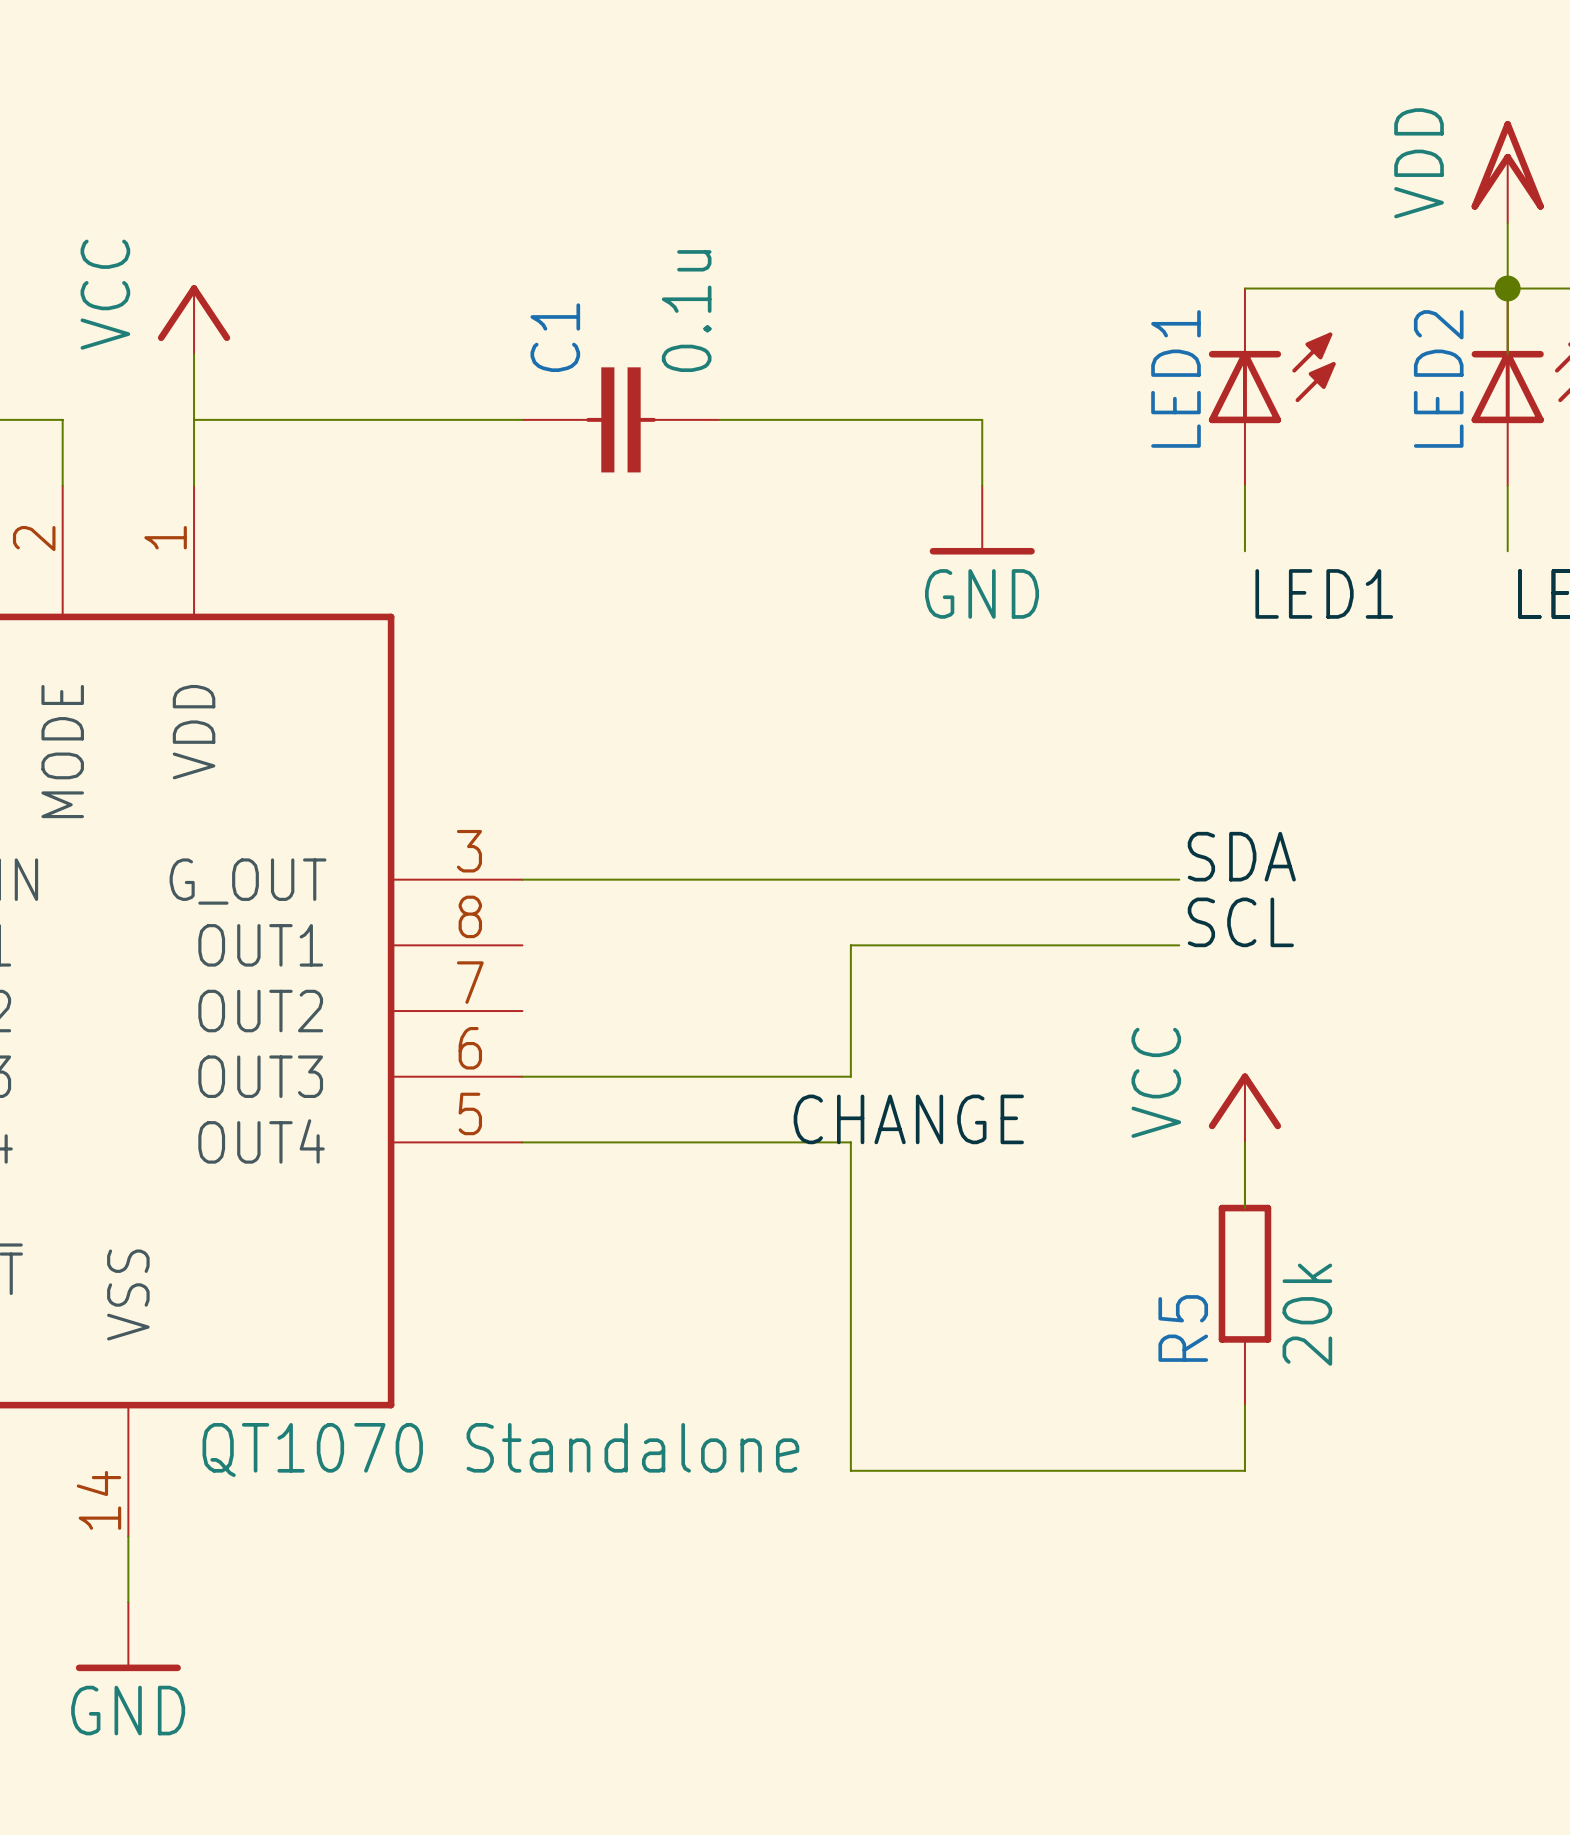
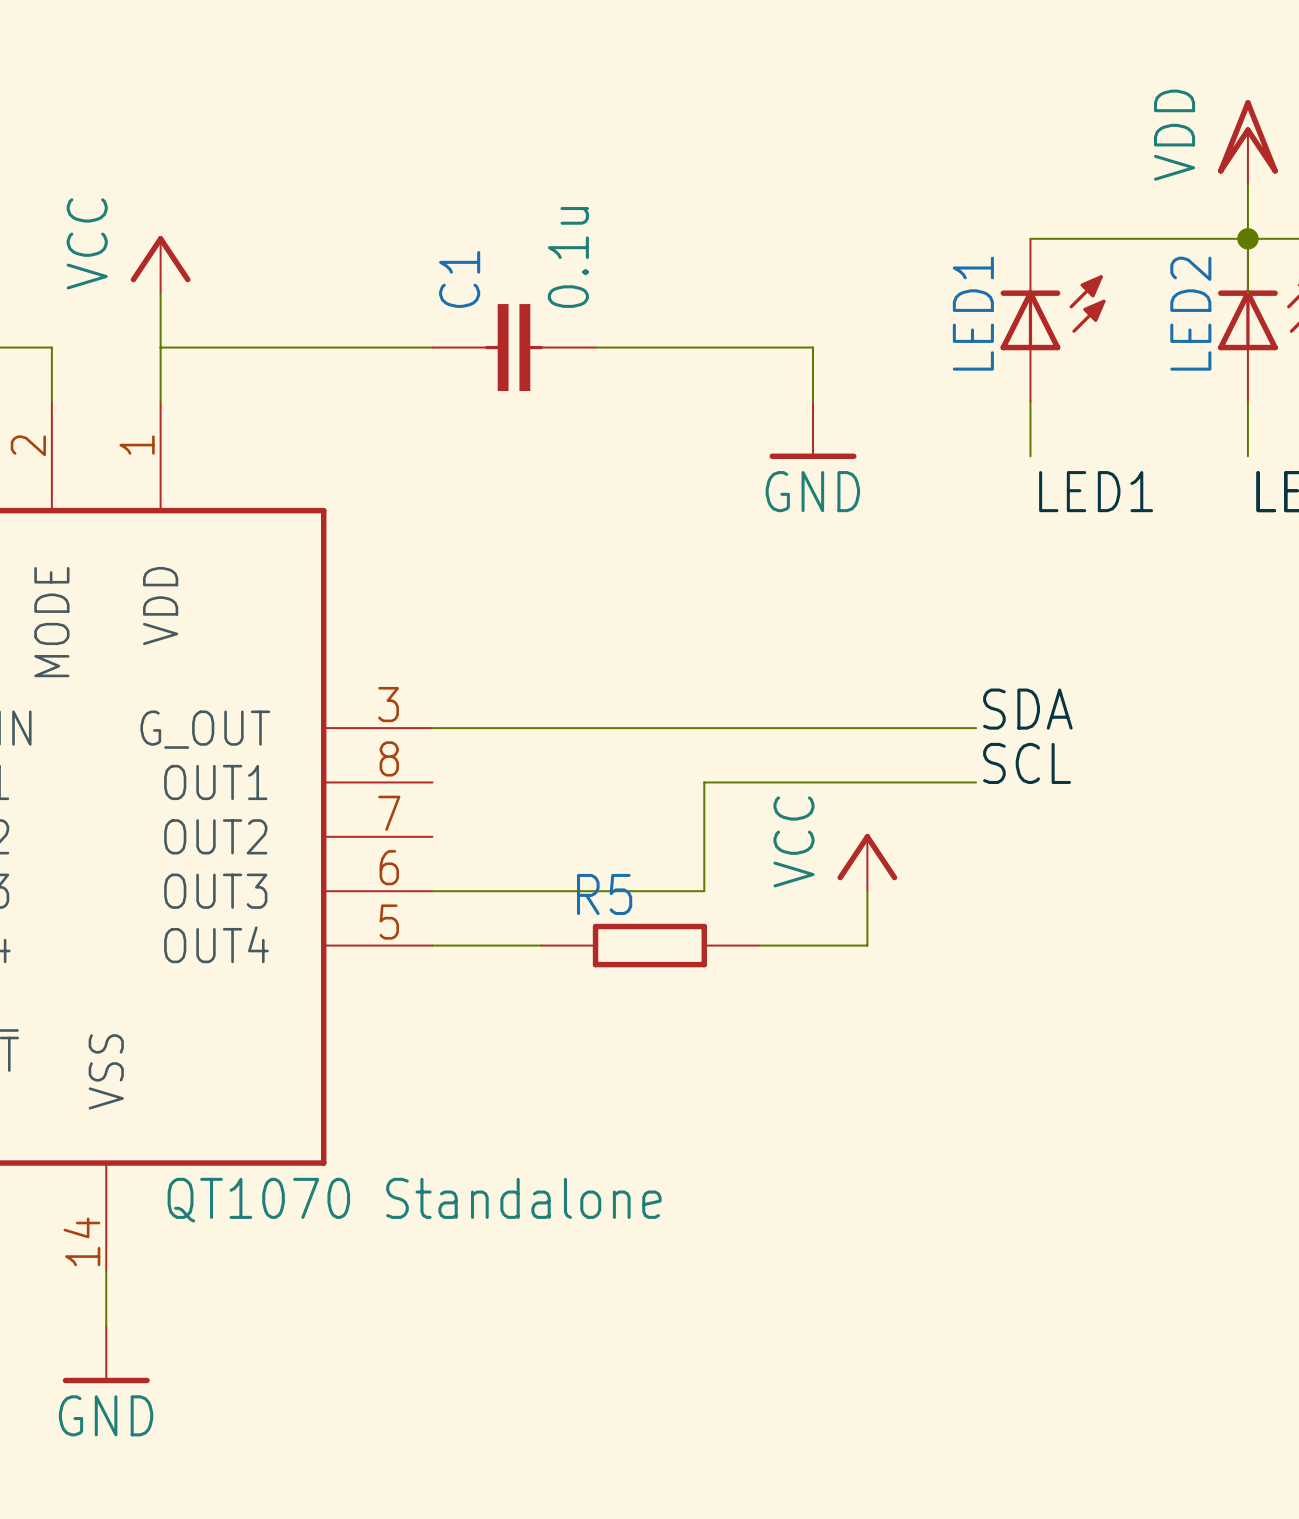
wire: none -> (867, 891) (867, 945) (758, 945)
power symbol position: VCC (1244, 1107) -> VCC (867, 862)
label: CHANGE (908, 1119) -> none
wire: (653, 1142) (850, 1142) (850, 1470) (1244, 1470) (1244, 1405) -> none
wire: (1244, 1142) (1244, 1208) -> none
R5 rotation: 0° (1244, 1273) -> 90° clockwise (649, 945)
R5 position: (1244, 1273) -> (649, 945)
R5 value: 20k (1307, 1314) -> none

